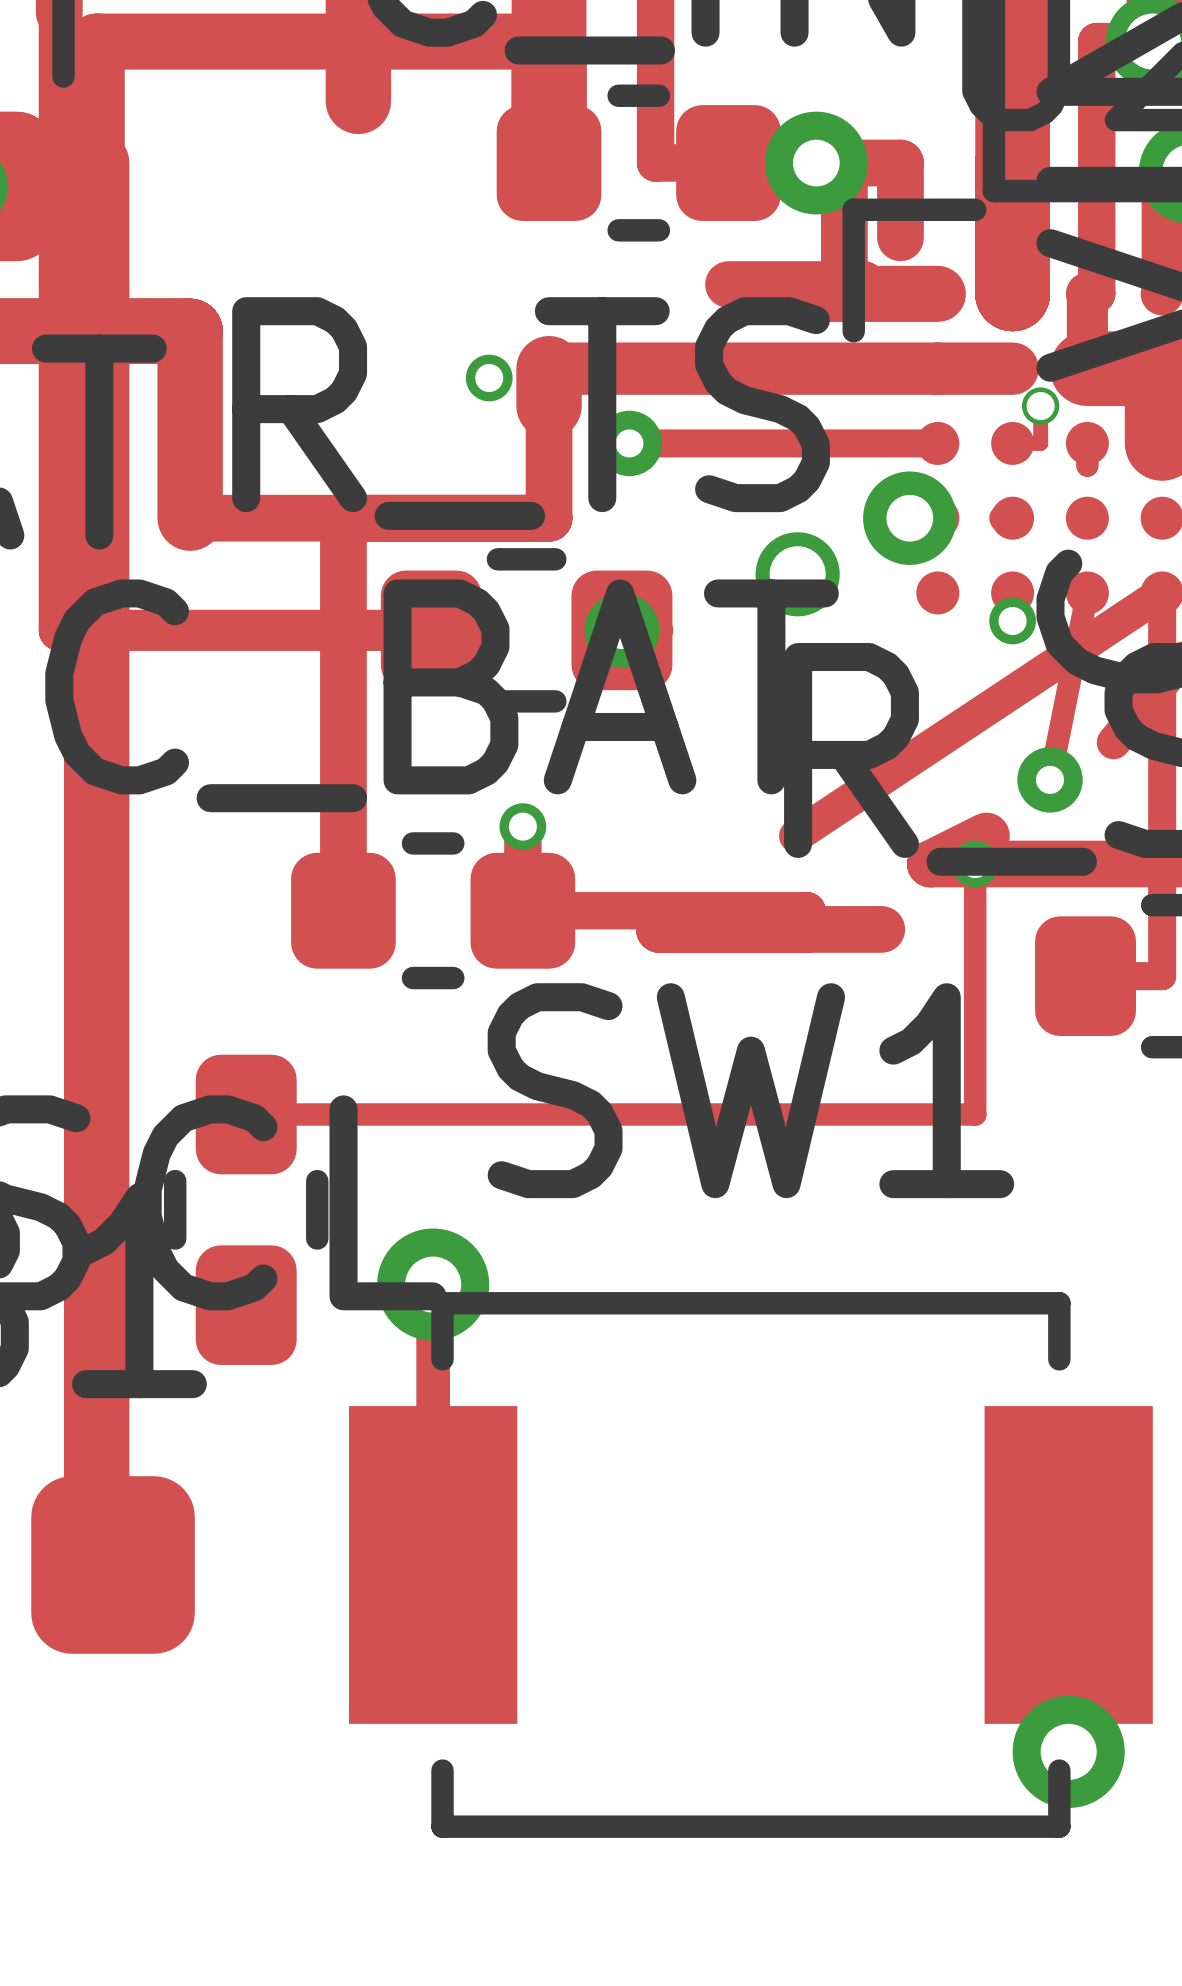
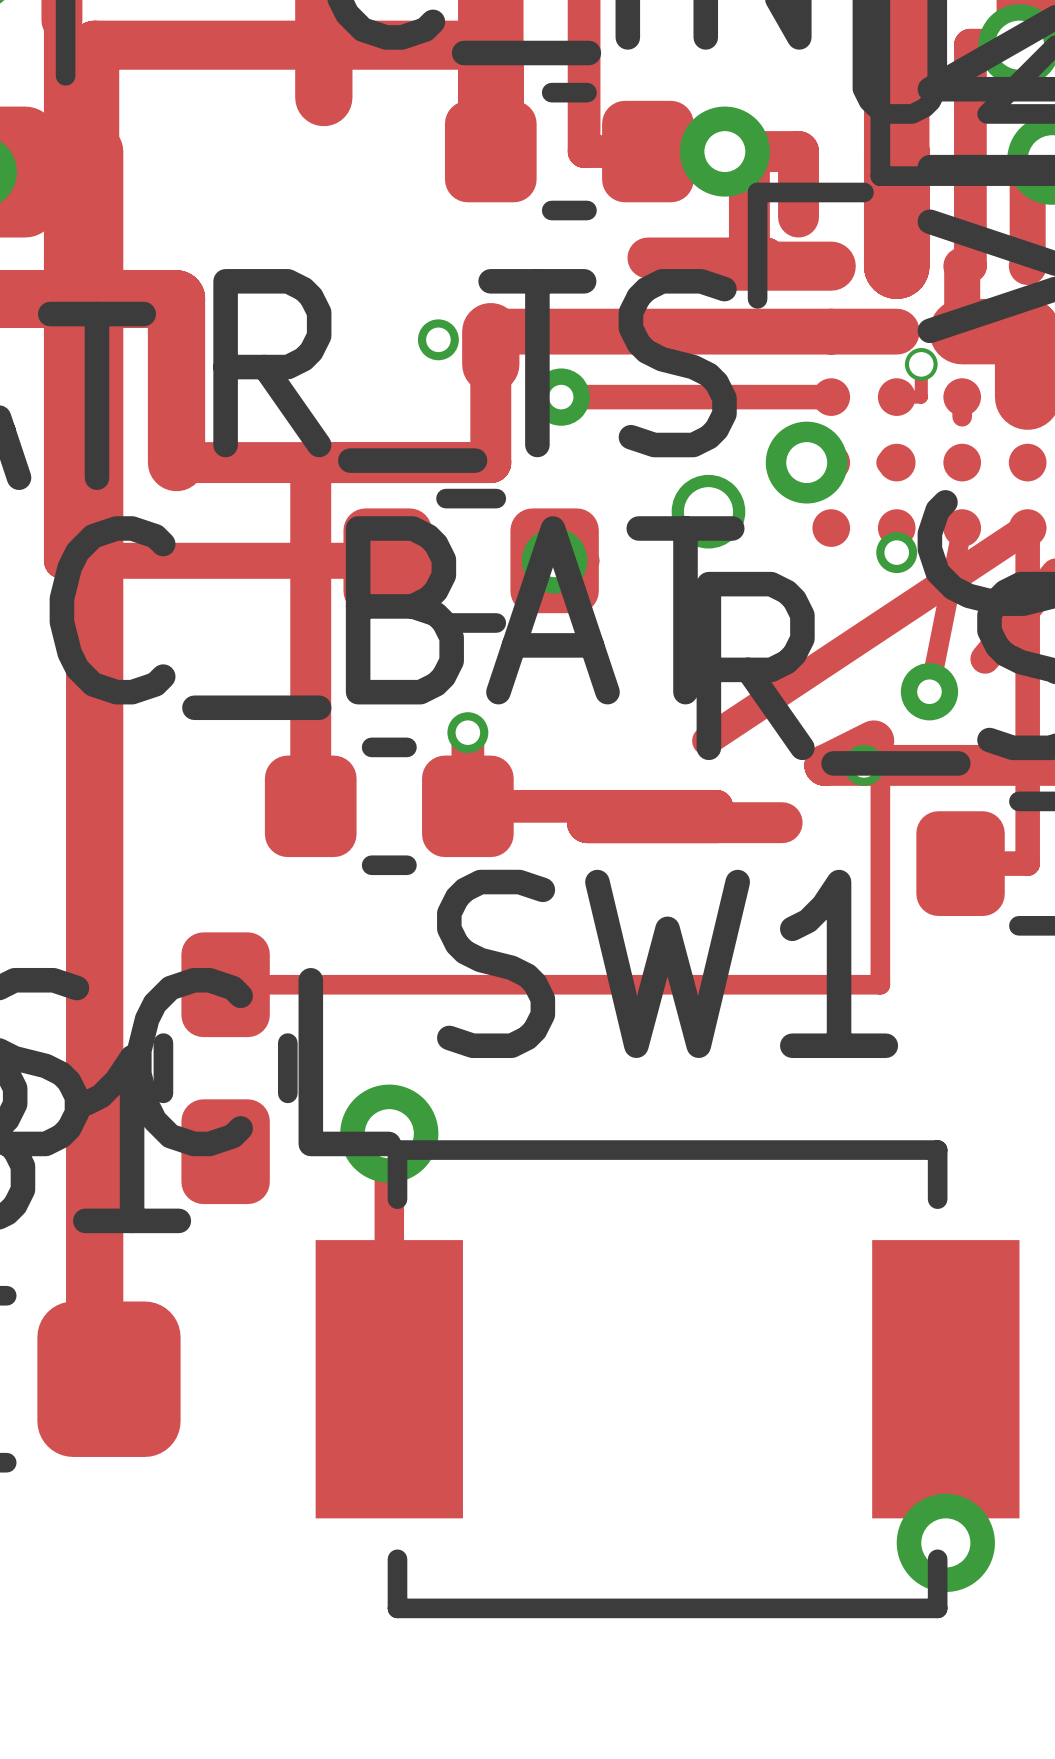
track: (975, 864) (975, 1114) -> (863, 765) (880, 765) (880, 984) (863, 984)

